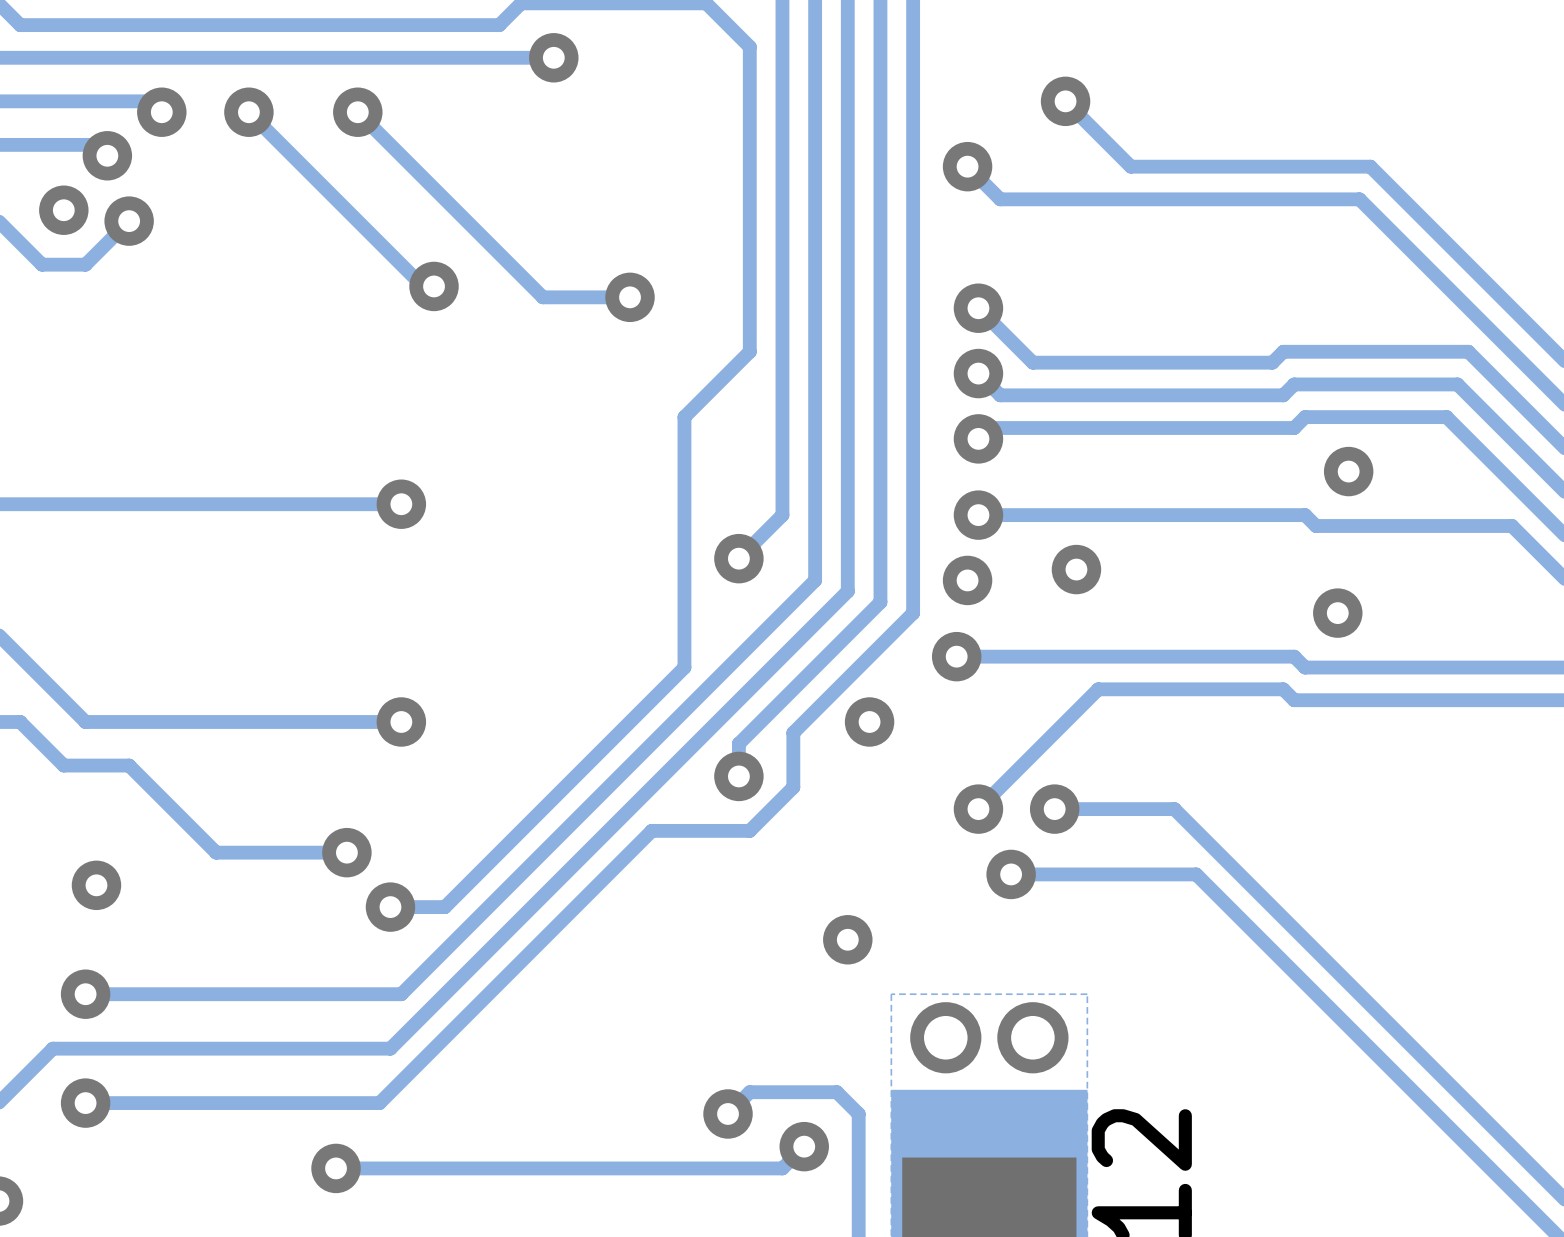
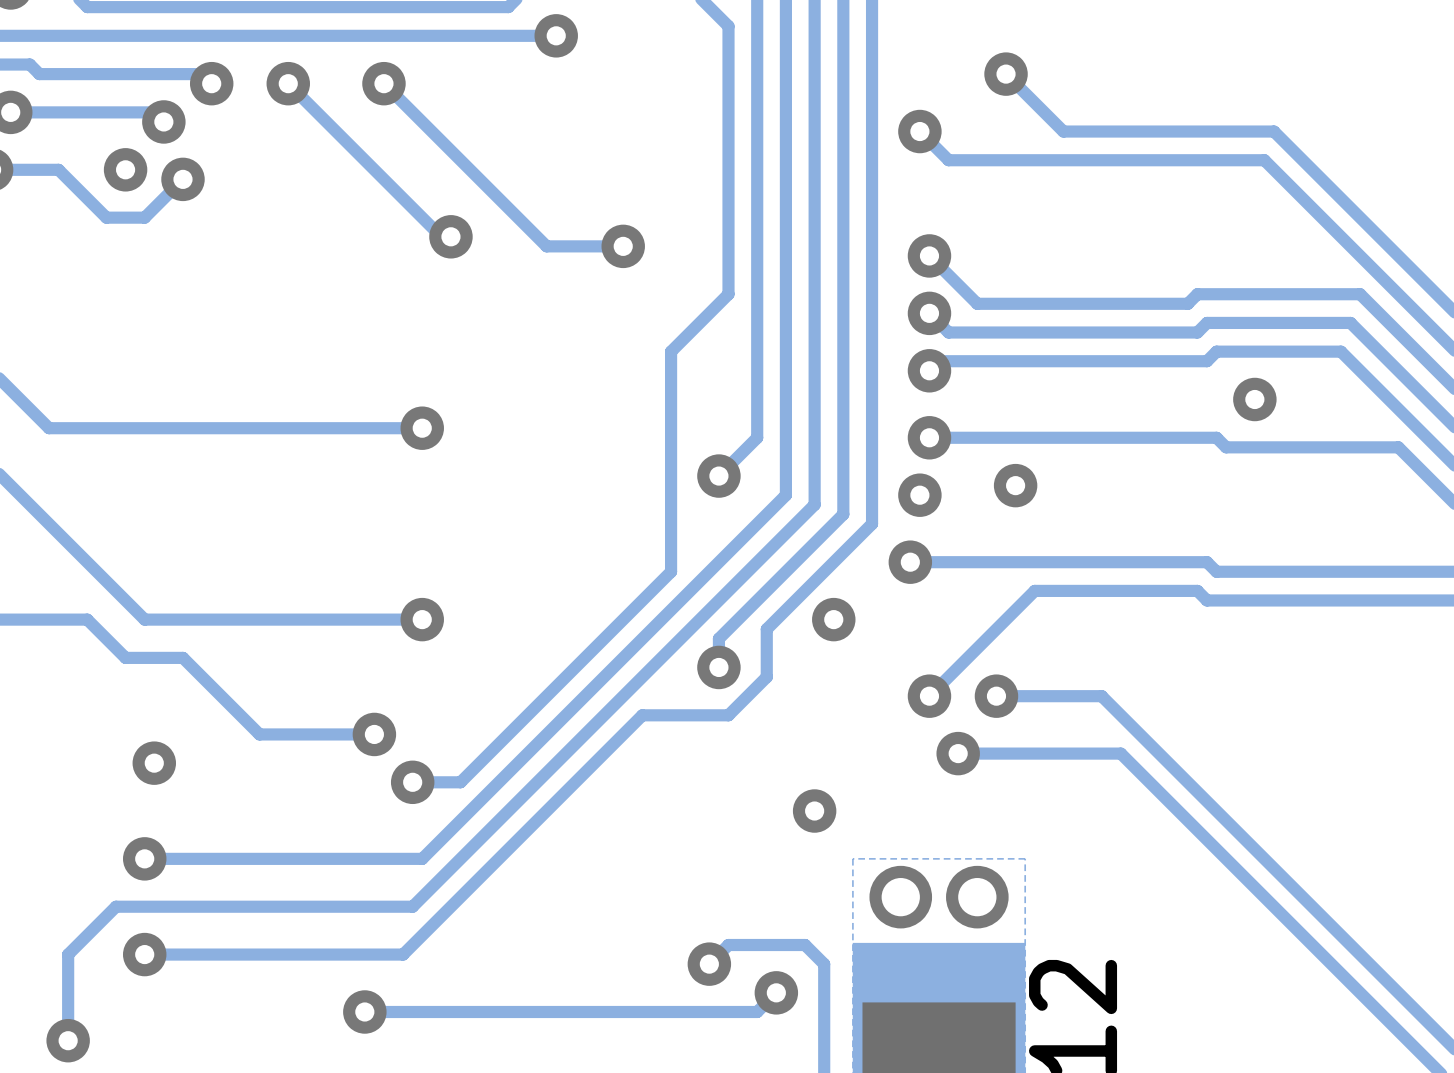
via: (1337, 613) -> none

